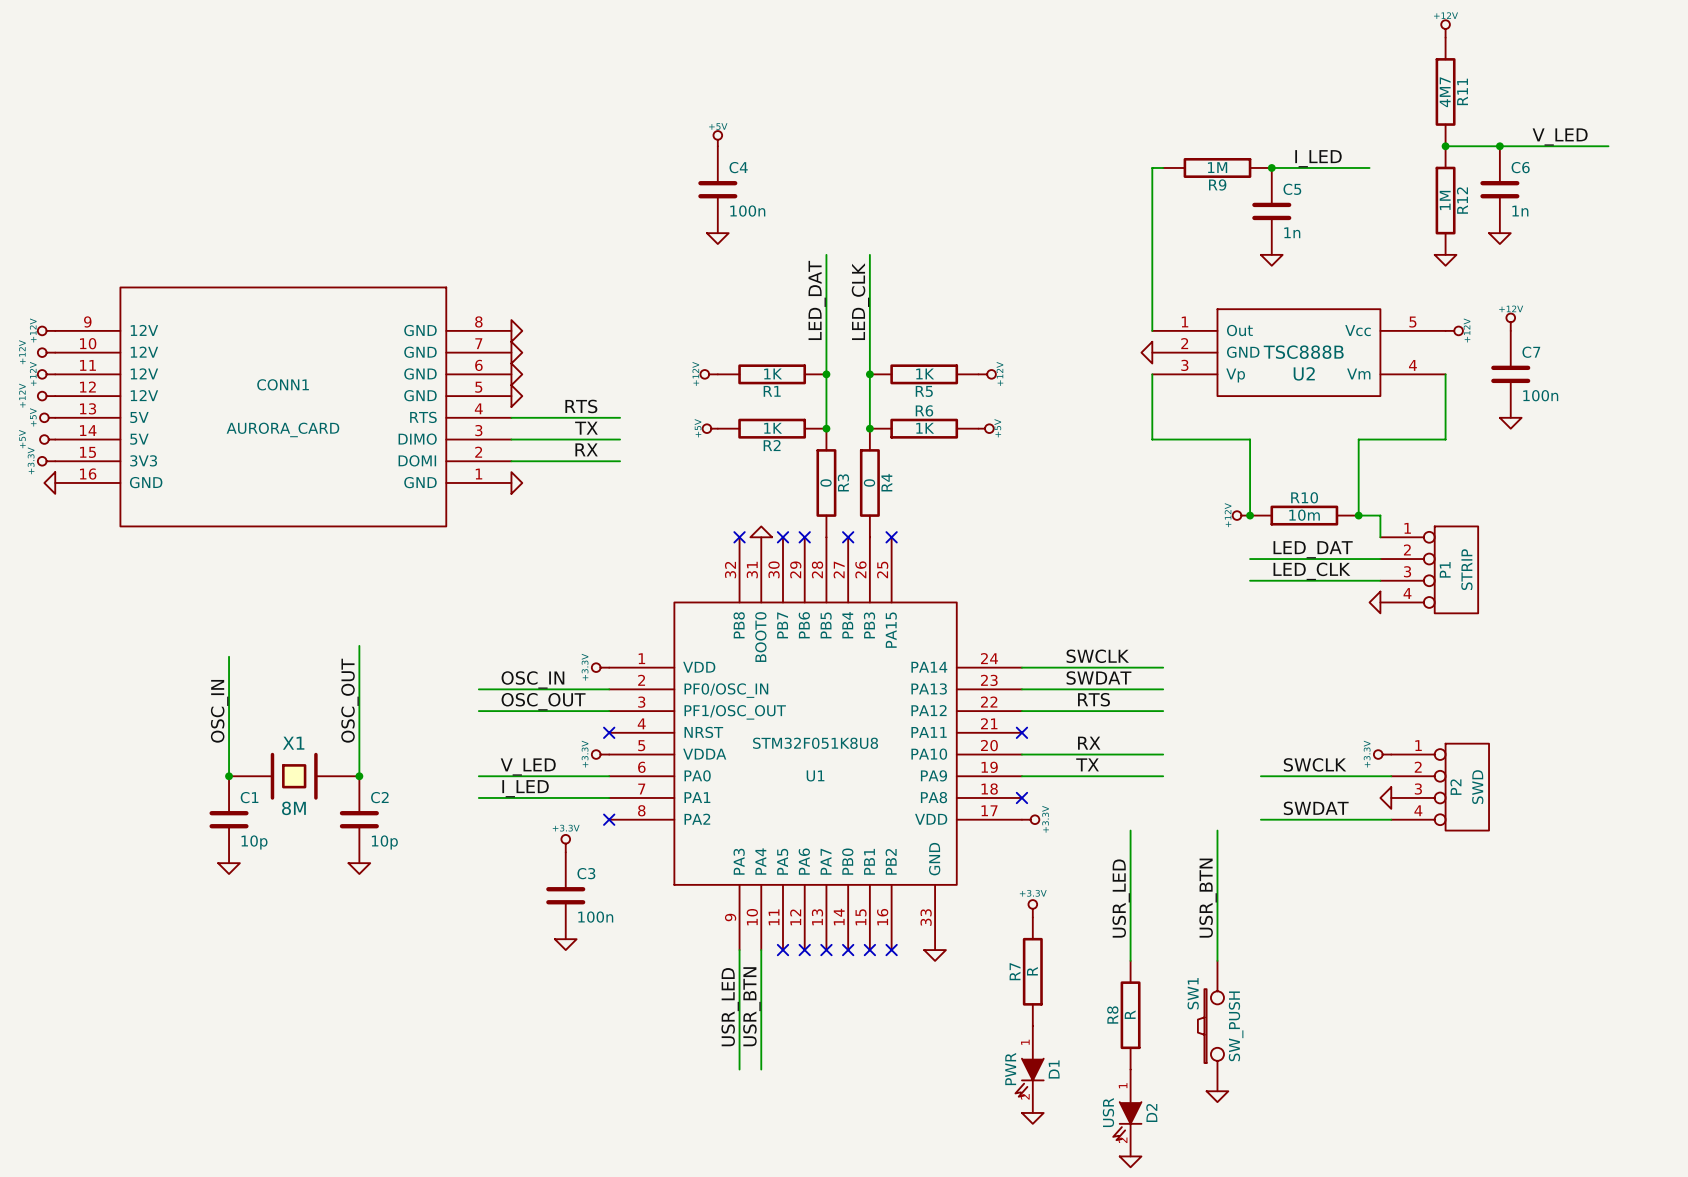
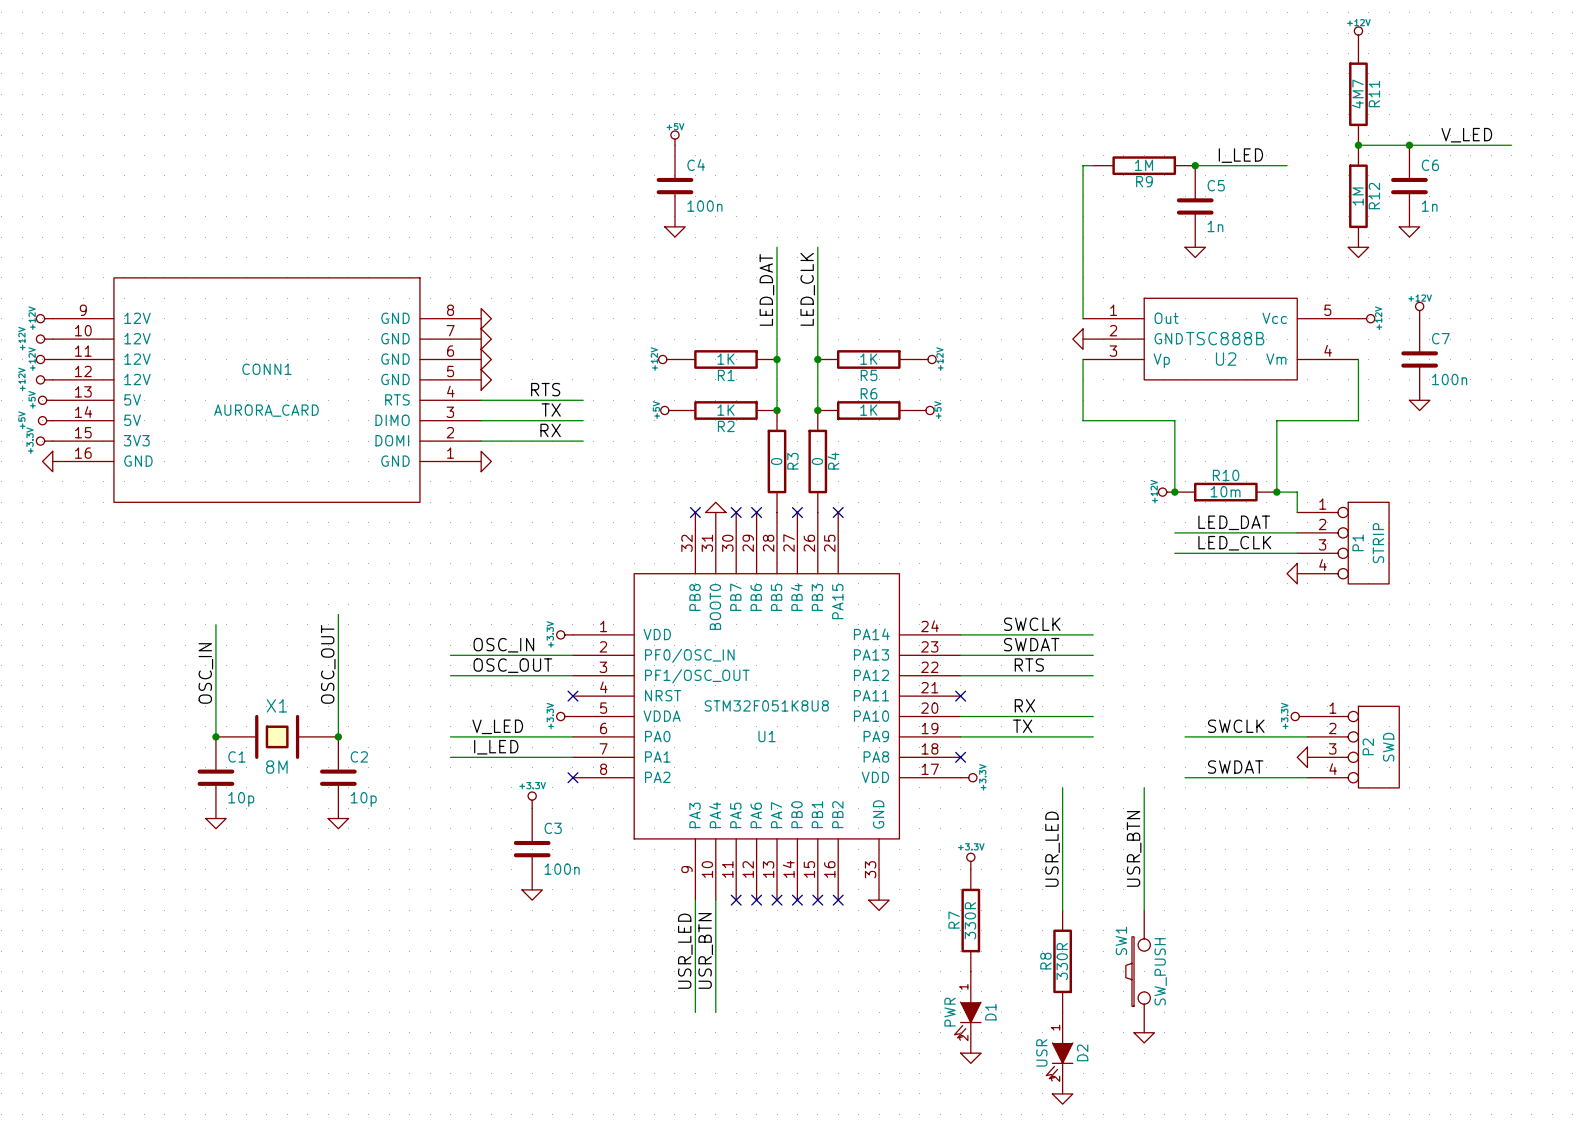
R7 value: R (1032, 971) -> 330R (970, 920)
R8 value: R (1130, 1014) -> 330R (1062, 961)

